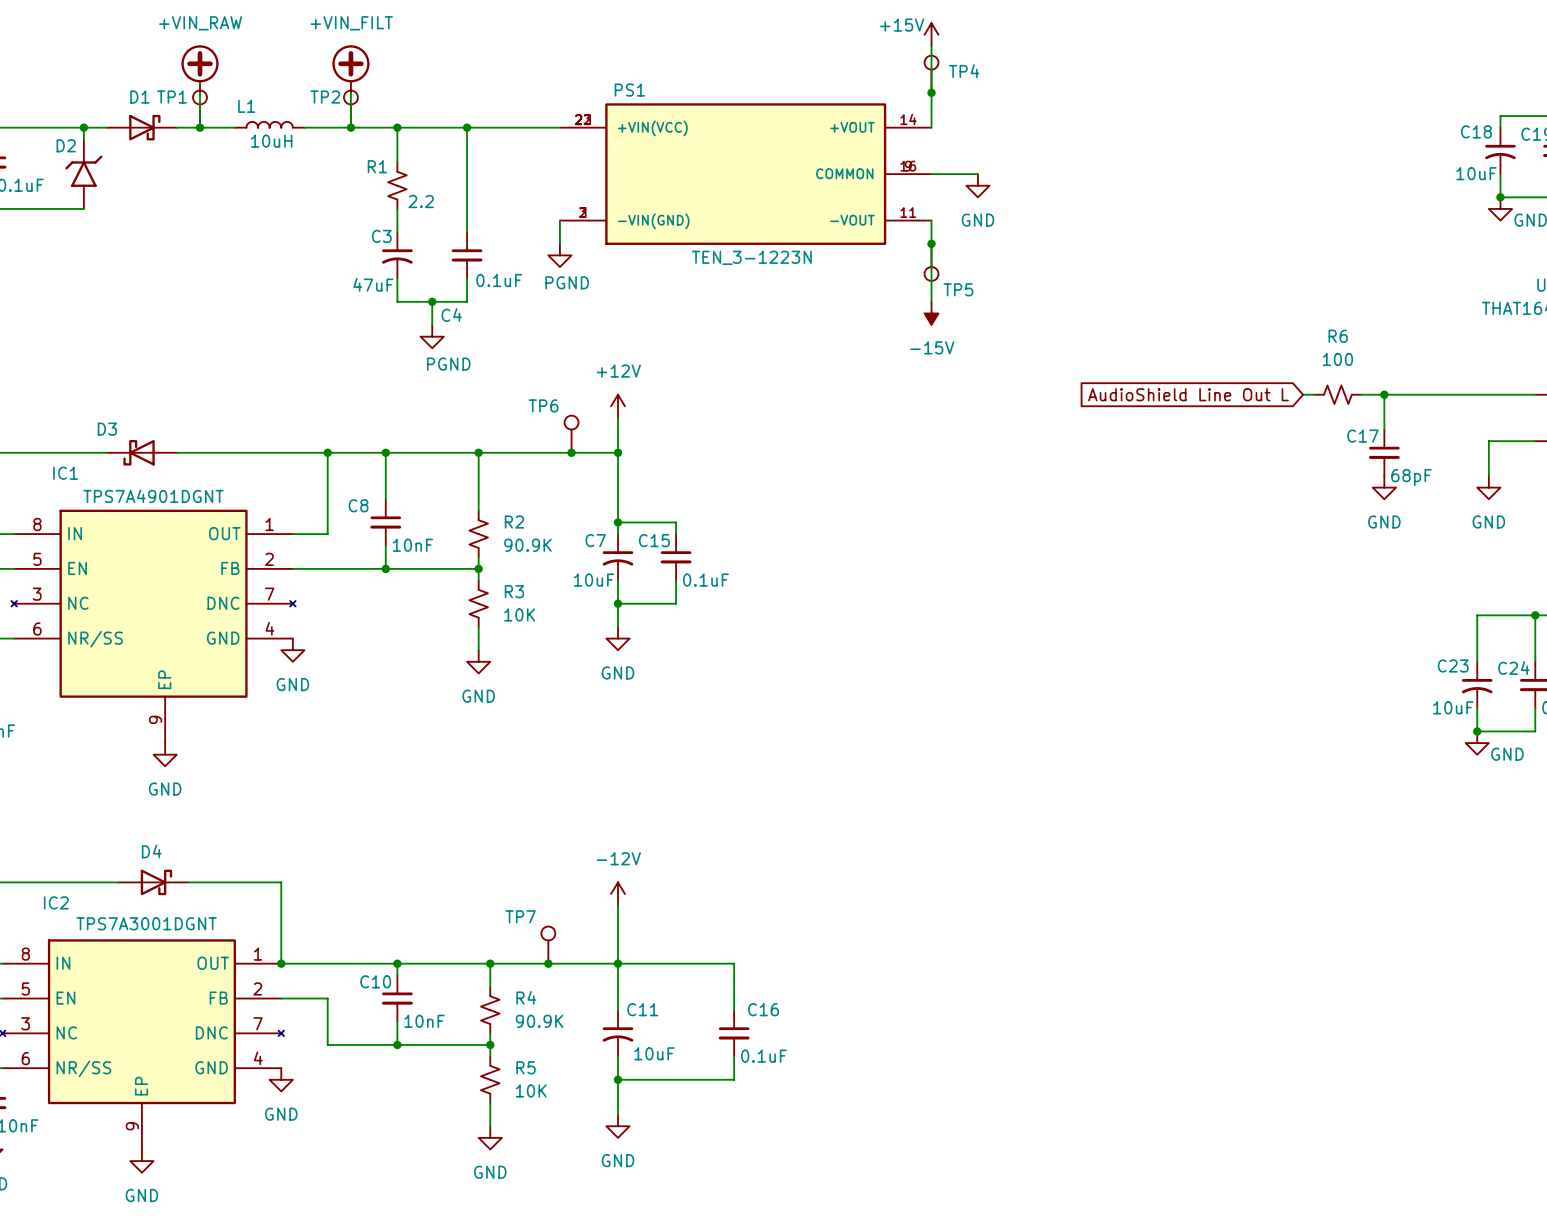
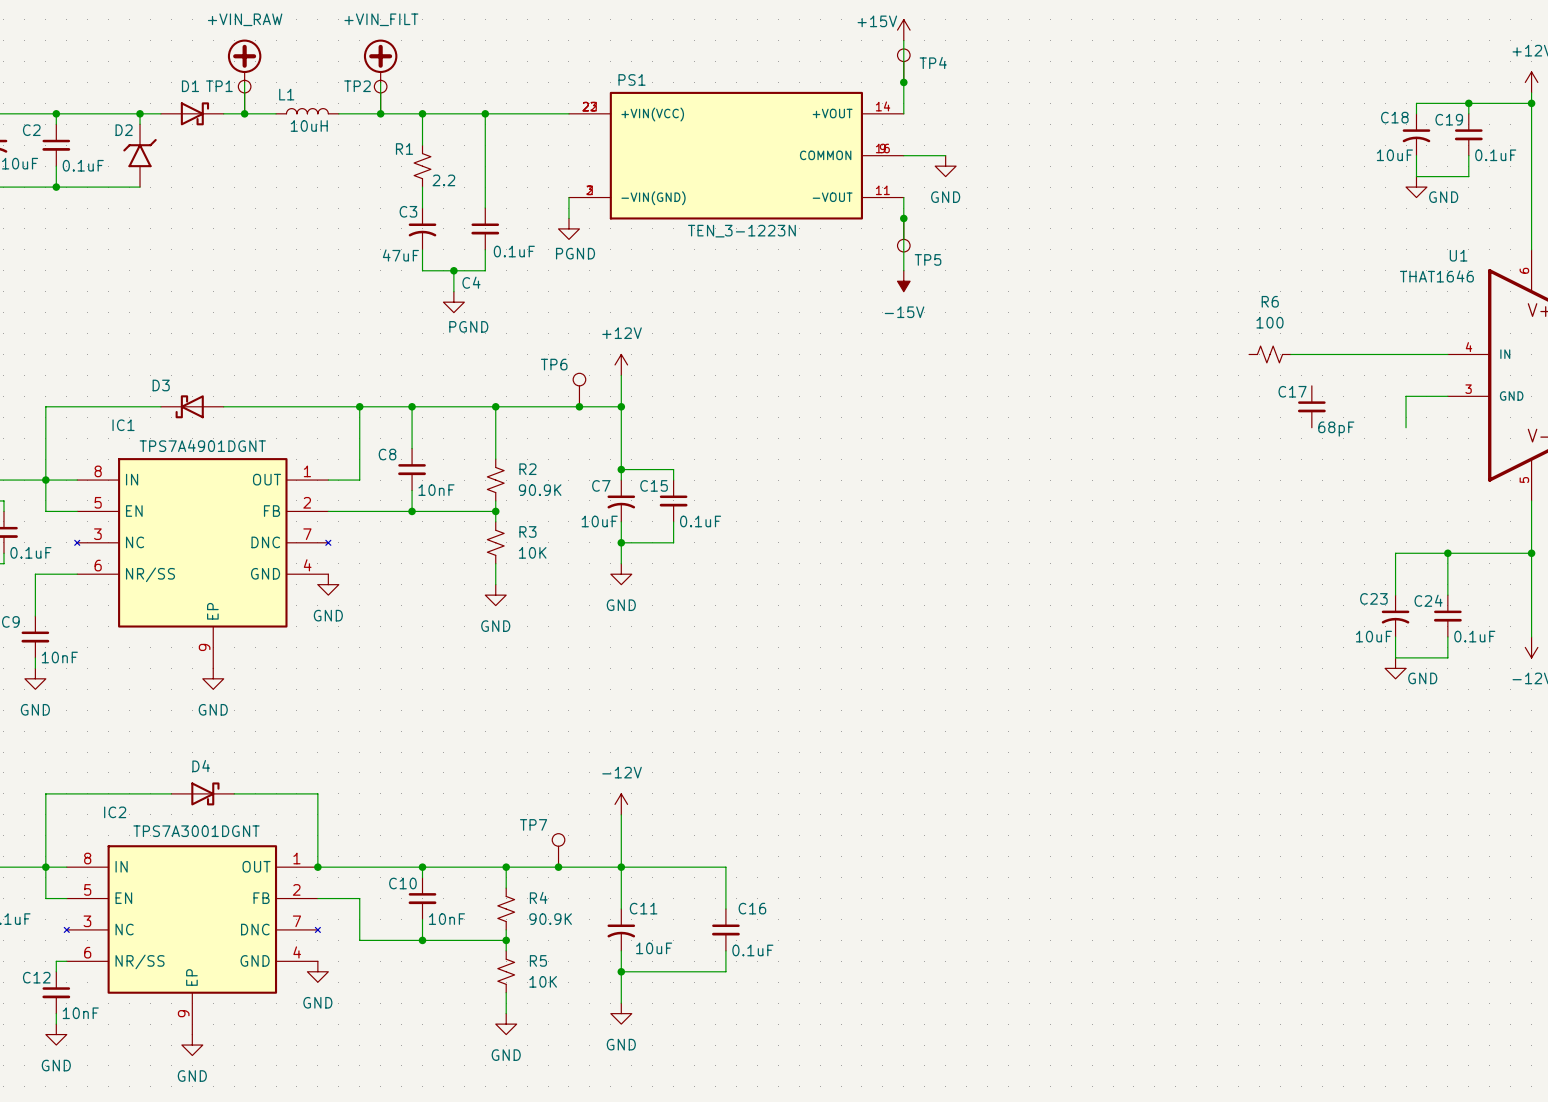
junction: (1500, 197) -> none
global label: AudioShield Line Out L (1188, 394) -> none
wire: (1303, 394) (1314, 394) -> none
wire: (1384, 394) (1384, 429) -> none
junction: (1384, 394) -> none
power symbol: GND (1384, 487) -> none
power symbol: GND (1488, 487) -> none
junction: (1477, 731) -> none

